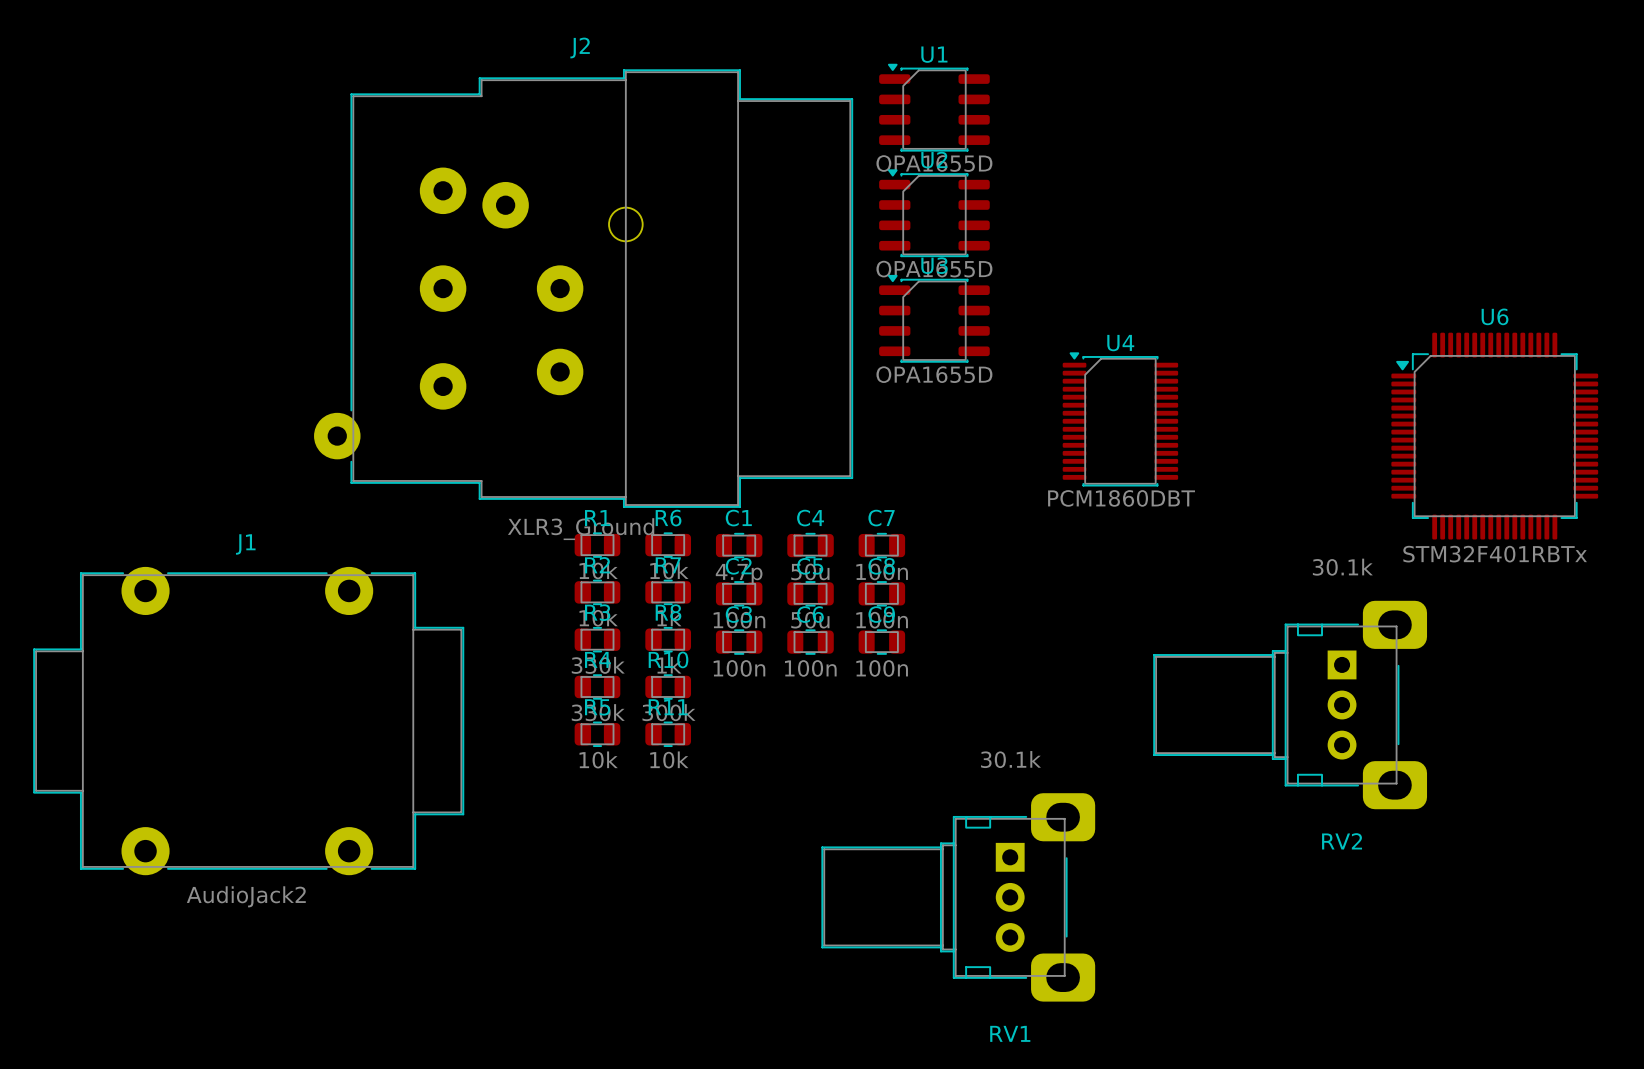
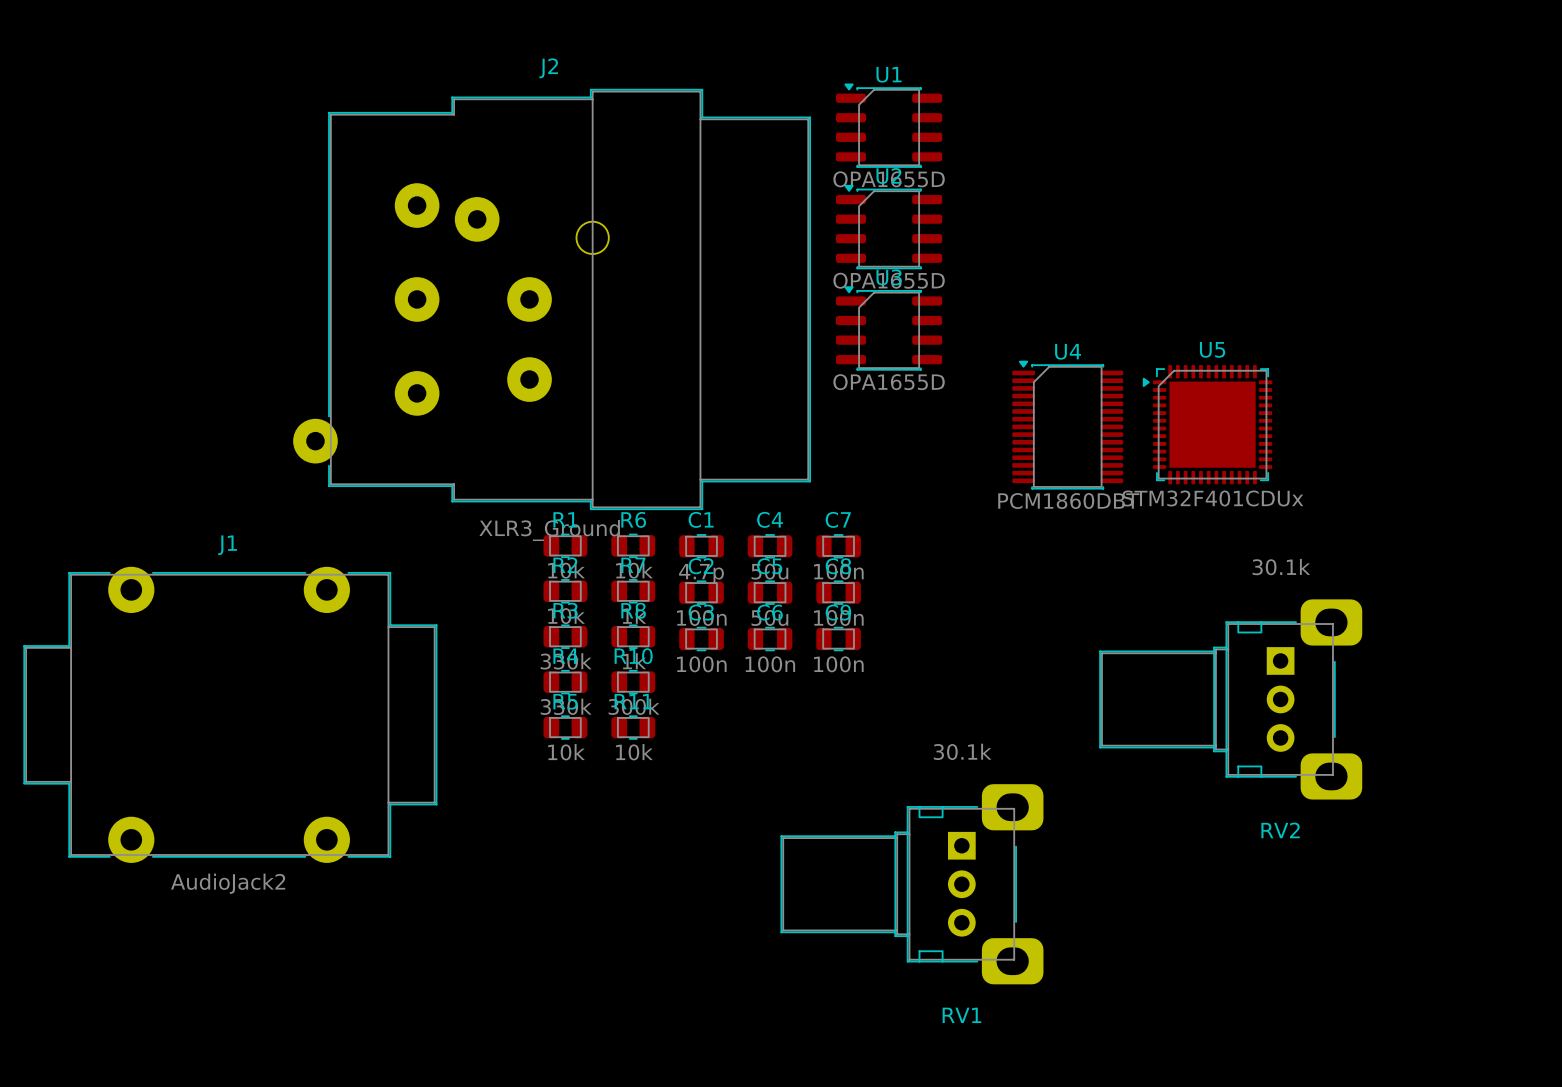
U5: none -> STM32F401CDUx (1207, 424)
U6: STM32F401RBTx (1494, 436) -> none

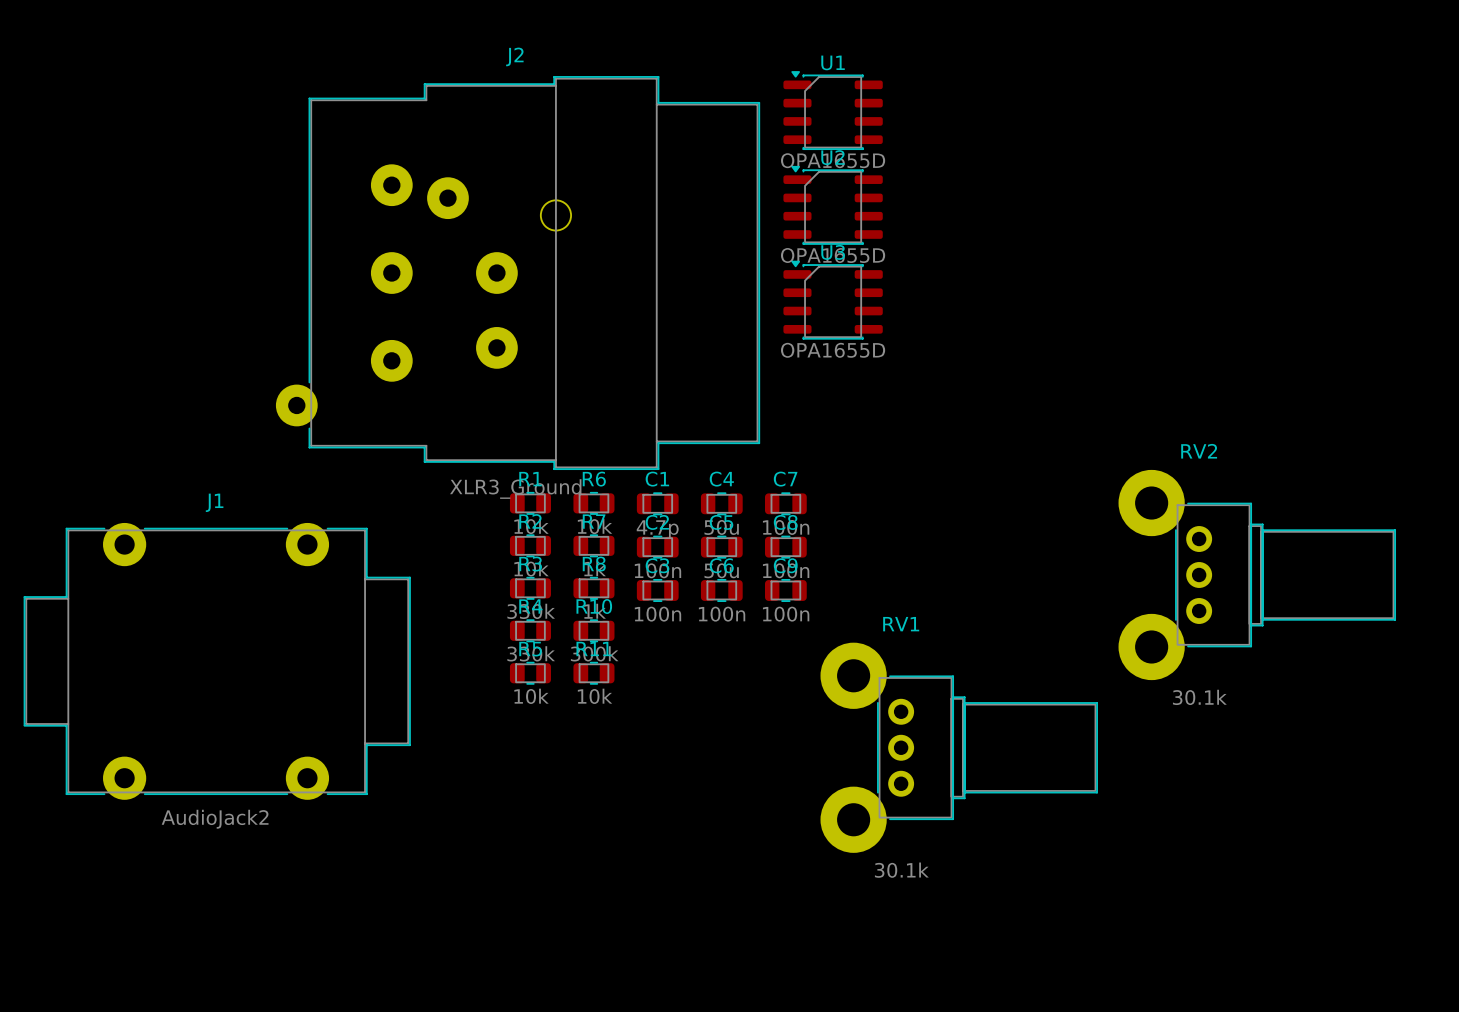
U5: STM32F401CDUx (1207, 424) -> none
U4: PCM1860DBT (1067, 425) -> none
RV2 value position: 30.1k (1281, 567) -> 30.1k (1199, 697)
RV2 footprint: [1099, 599, 1363, 800] -> [1118, 469, 1396, 681]
RV1 value position: 30.1k (962, 751) -> 30.1k (901, 870)
RV1 footprint: [780, 784, 1044, 985] -> [820, 642, 1098, 853]
RV2 name position: RV2 (1280, 830) -> RV2 (1199, 451)
RV1 name position: RV1 (961, 1015) -> RV1 (901, 624)

